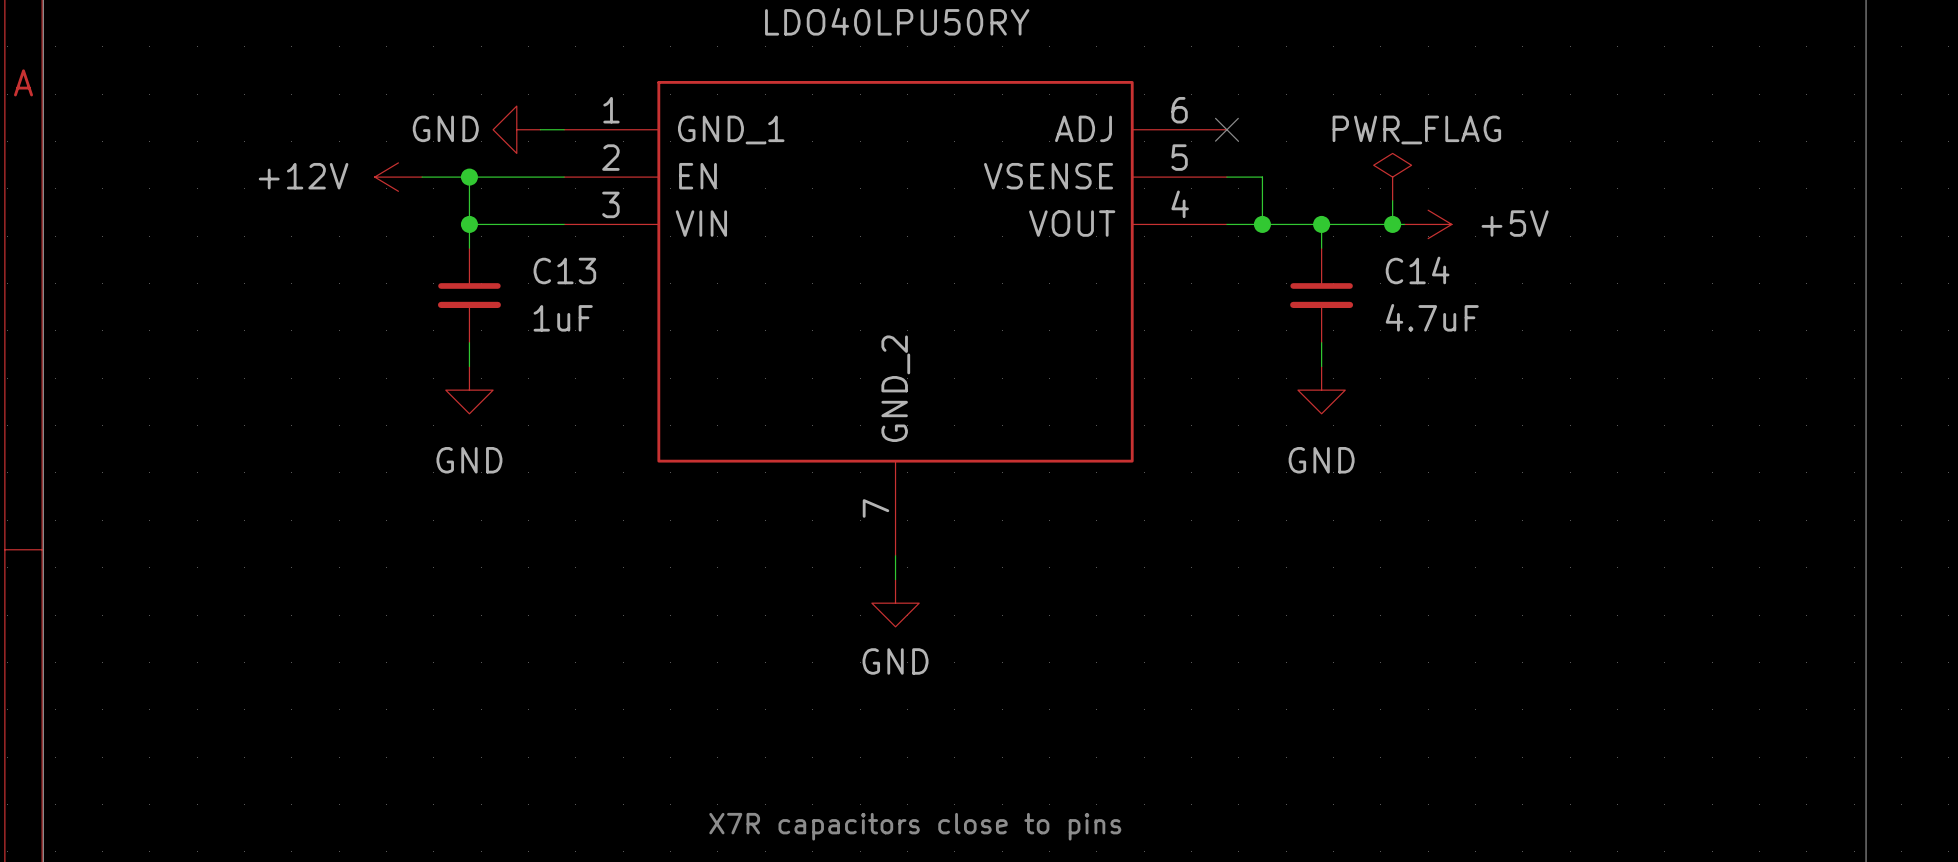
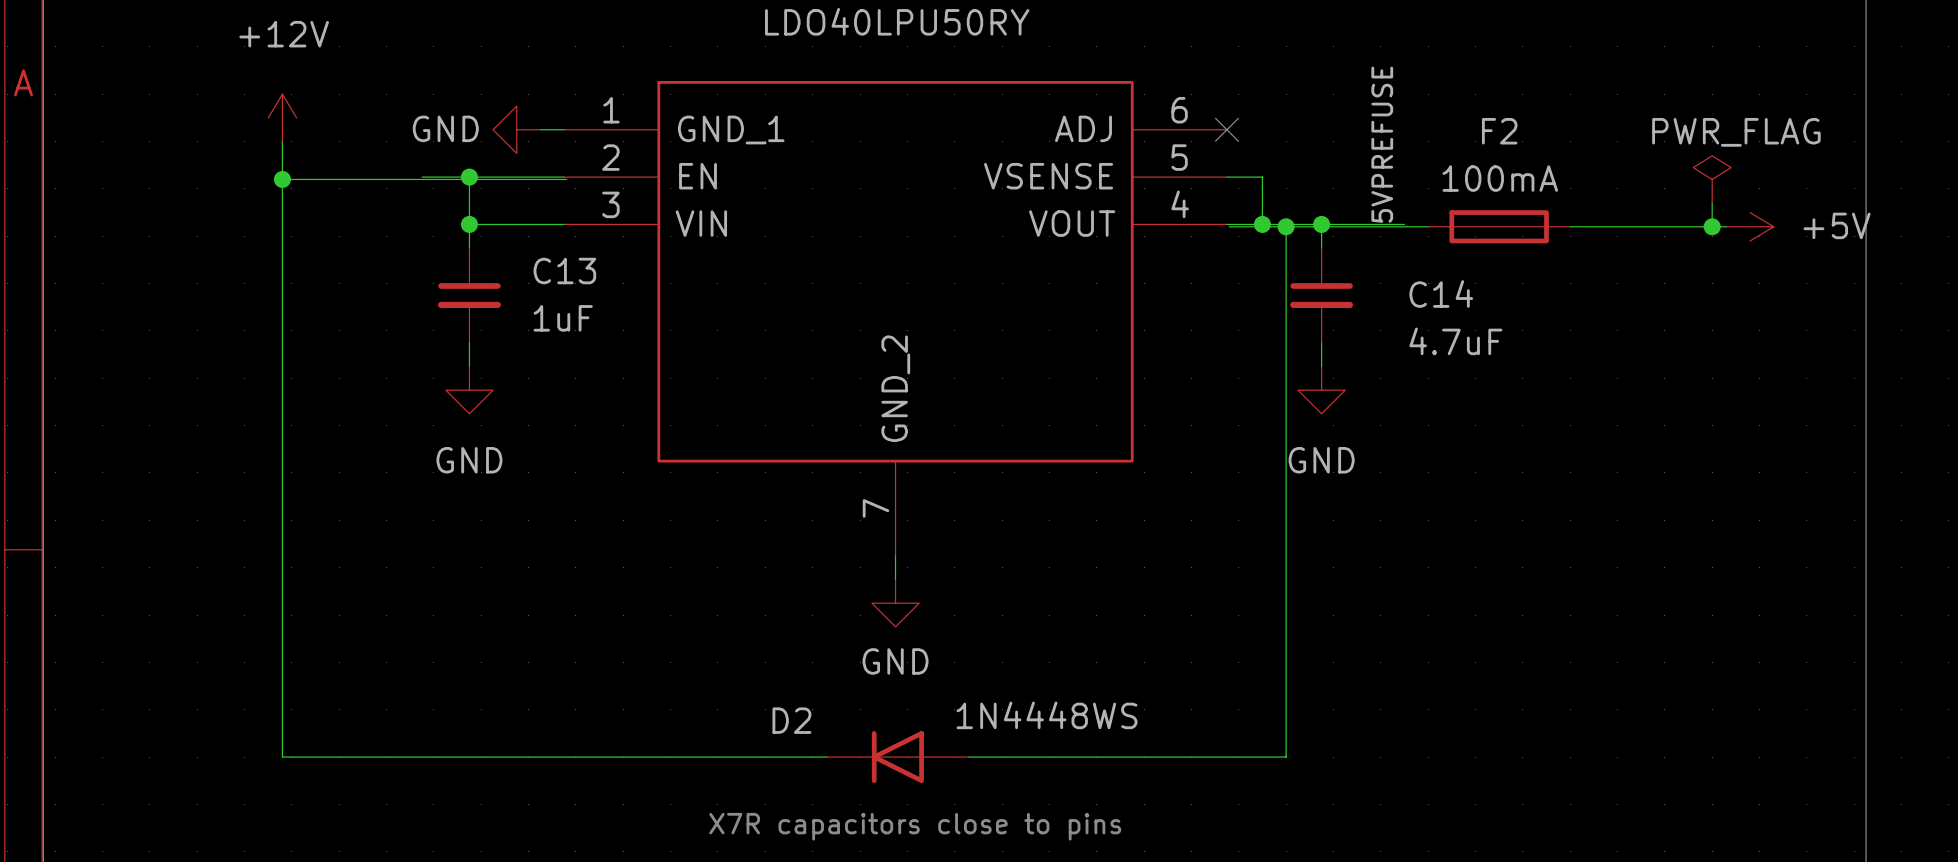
wire: none -> (282, 141) (282, 757) (826, 757)
label: none -> 5VPREFUSE (1382, 144)
power symbol rotation: 0° (398, 177) -> 90° clockwise (282, 117)
power symbol position: +12V (398, 177) -> +12V (282, 117)
power symbol position: PWR_FLAG (1392, 177) -> PWR_FLAG (1712, 179)
wire: none -> (282, 179) (566, 179)
junction: none -> (282, 179)
wire: (1392, 200) (1392, 224) -> (1712, 203) (1712, 226)
junction position: (1392, 224) -> (1286, 226)
power symbol position: +5V (1428, 224) -> +5V (1750, 226)
wire: none -> (1229, 226) (1428, 226)
wire: none -> (1286, 226) (1286, 757) (968, 757)
F2: none -> 100mA (1499, 226)
wire: none -> (1570, 226) (1726, 226)
junction: none -> (1712, 226)
C14 name position: C14 (1417, 270) -> C14 (1441, 294)
C14 value position: 4.7uF (1432, 317) -> 4.7uF (1455, 341)
D2: none -> 1N4448WS (897, 757)

